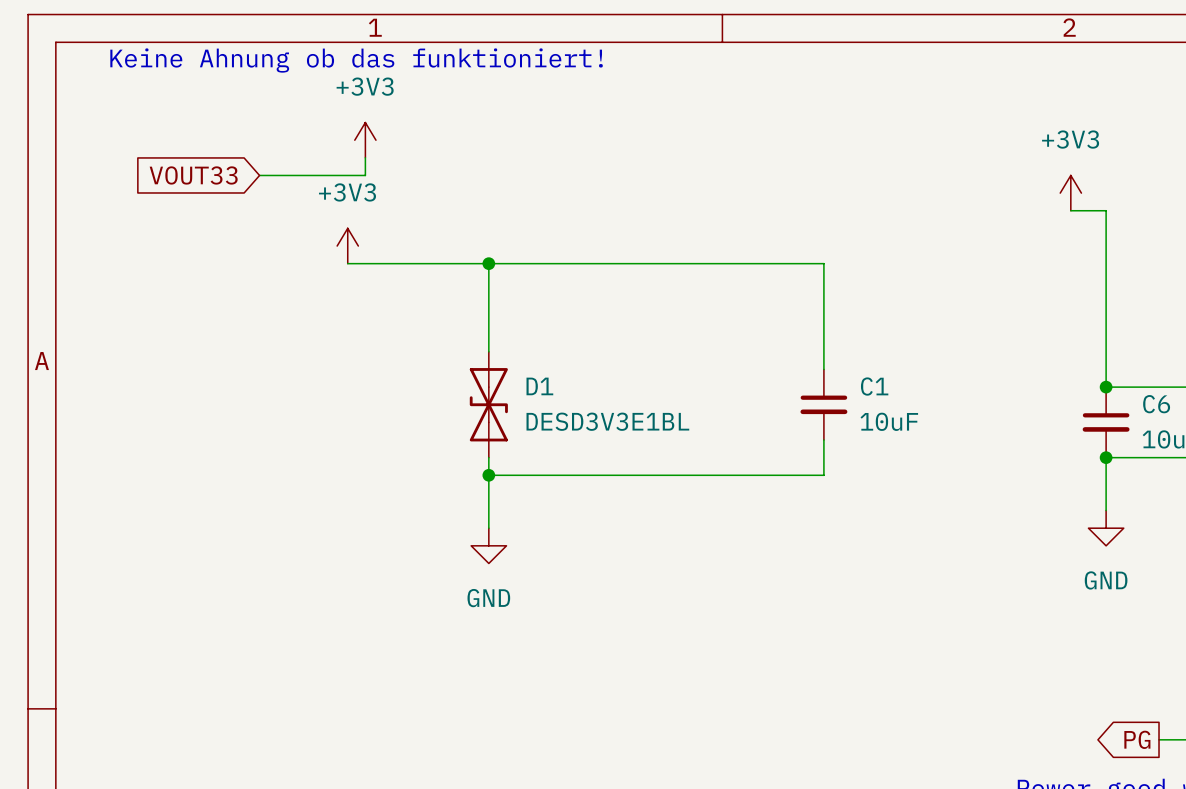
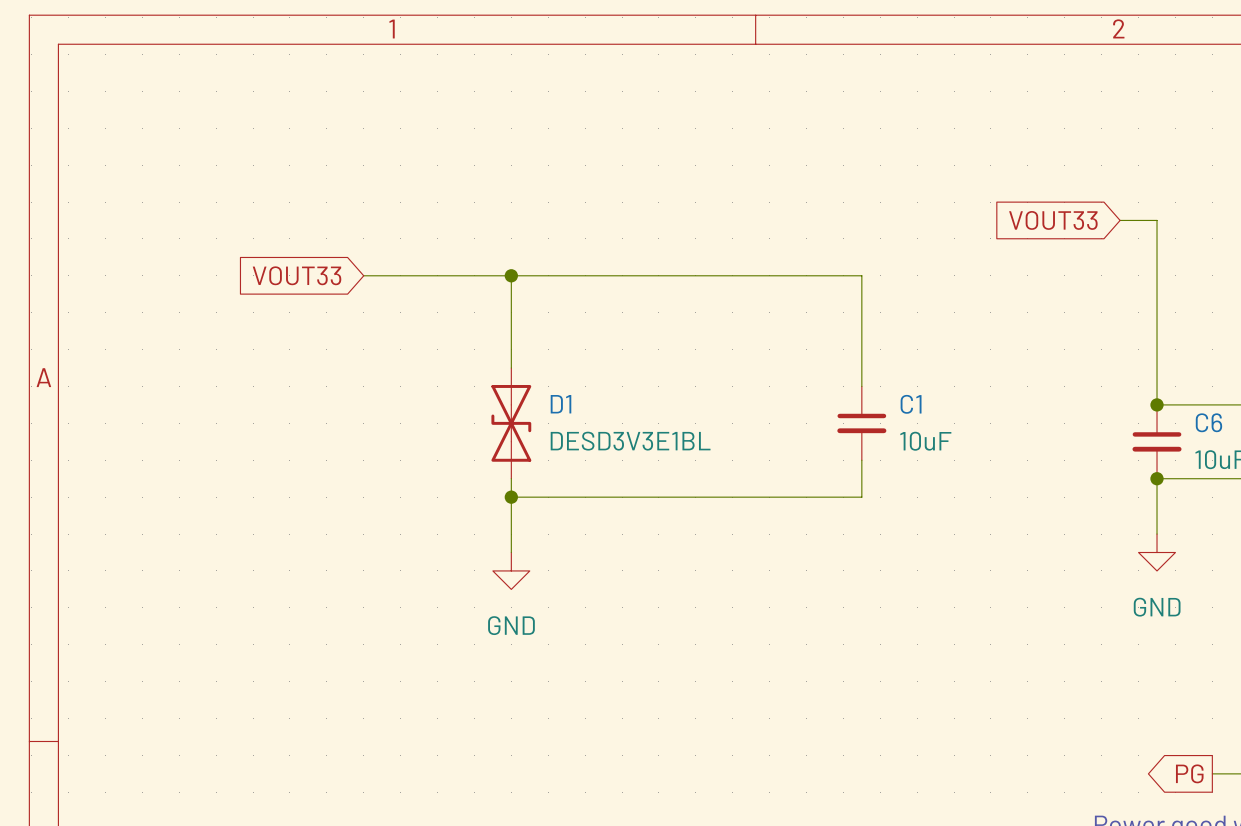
text: Keine Ahnung ob das funktioniert! (356, 60) -> none
power symbol: +3V3 (365, 140) -> none
wire: (365, 157) (365, 175) (259, 175) -> none
global label position: VOUT33 (193, 175) -> VOUT33 (297, 275)
power symbol: +3V3 (1070, 193) -> none
global label: none -> VOUT33 (1053, 220)
power symbol: +3V3 (347, 246) -> none

